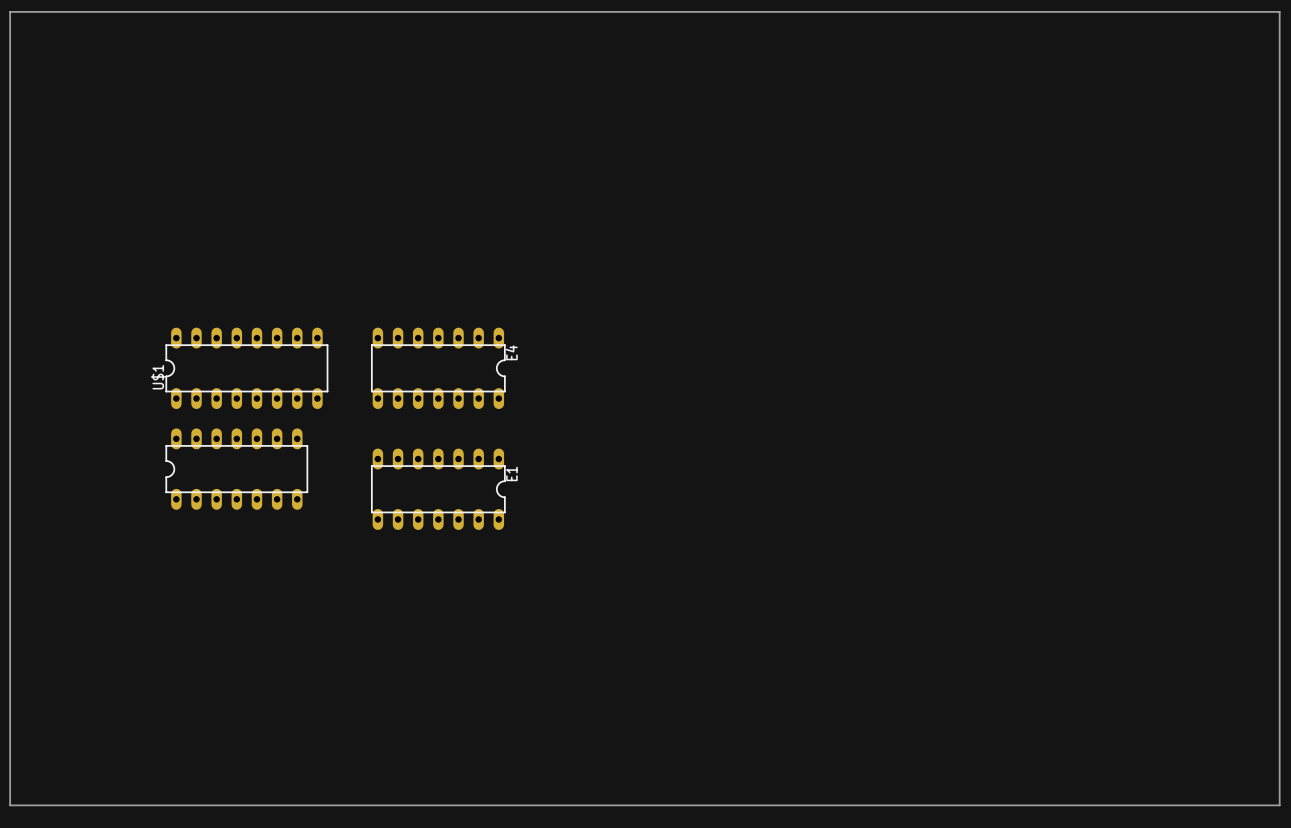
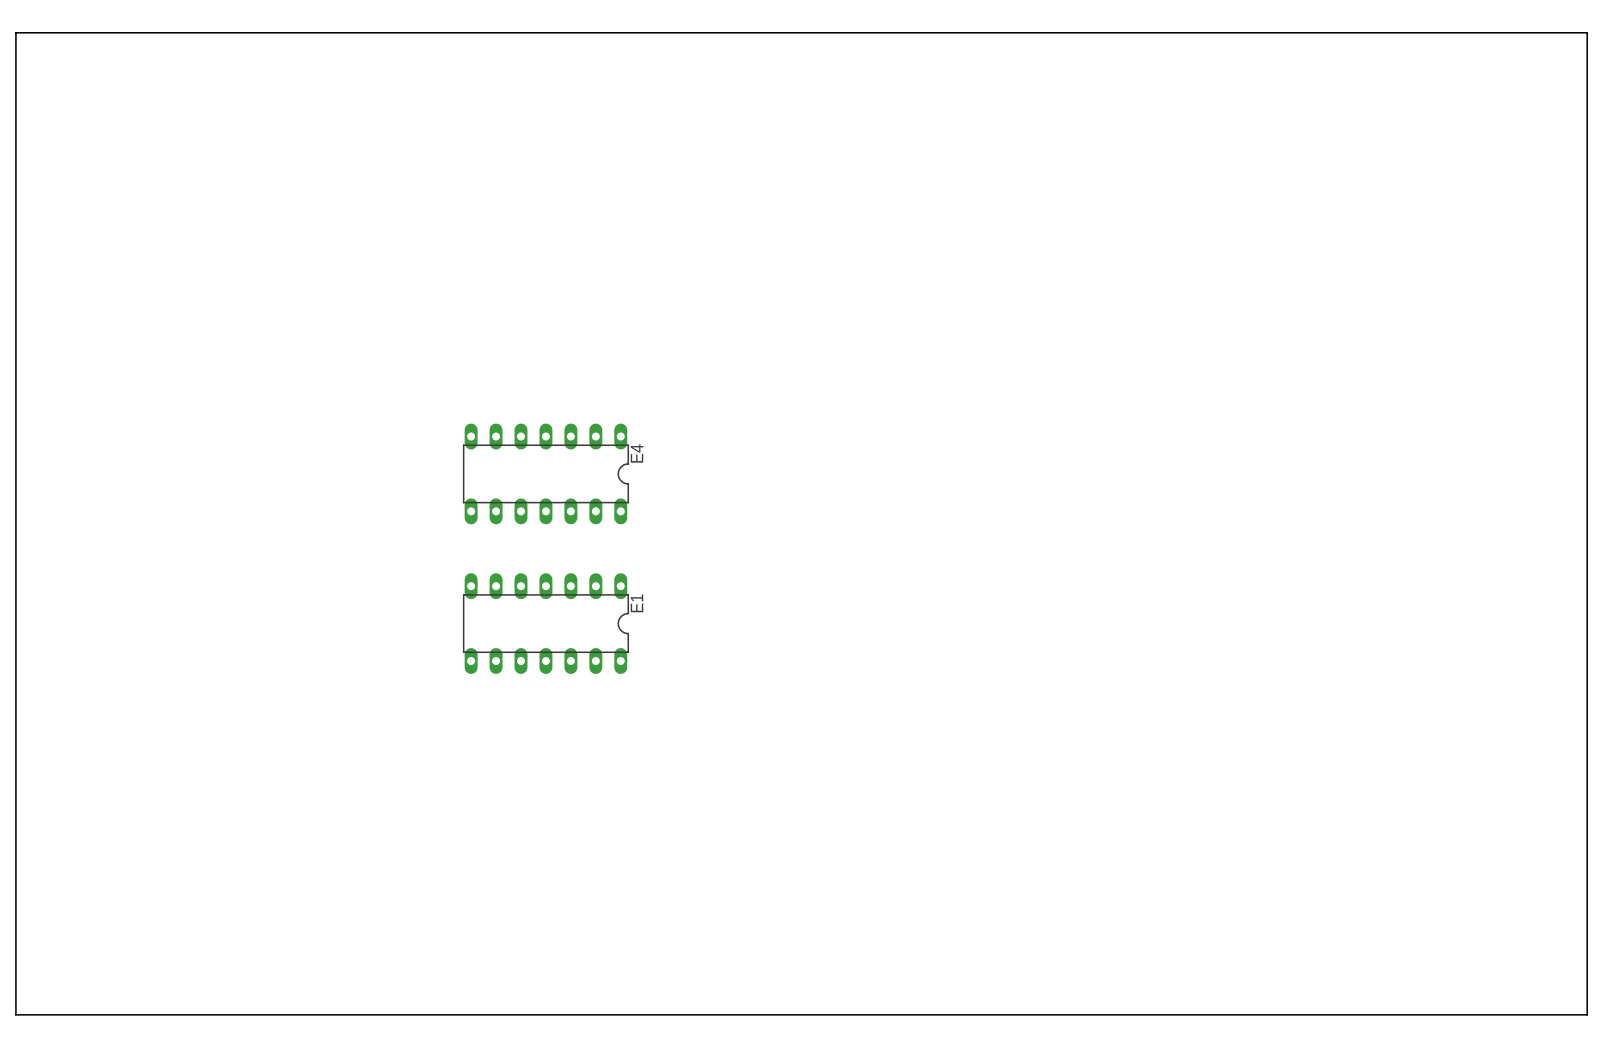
U$1: (246, 418) -> none

